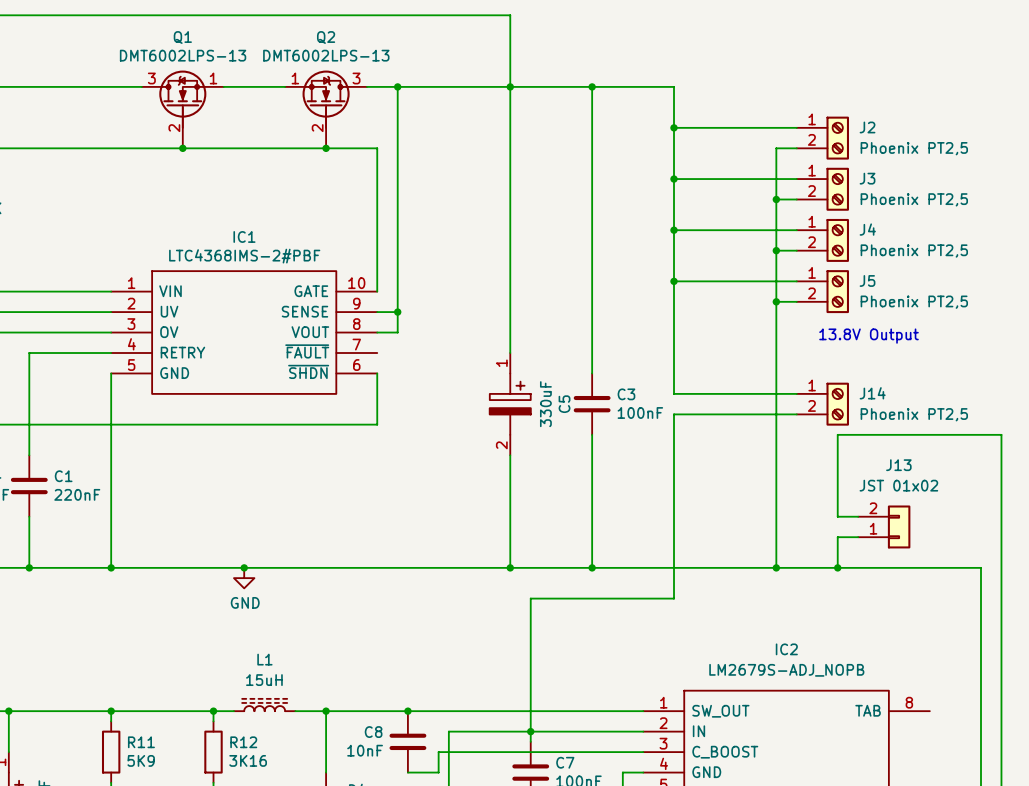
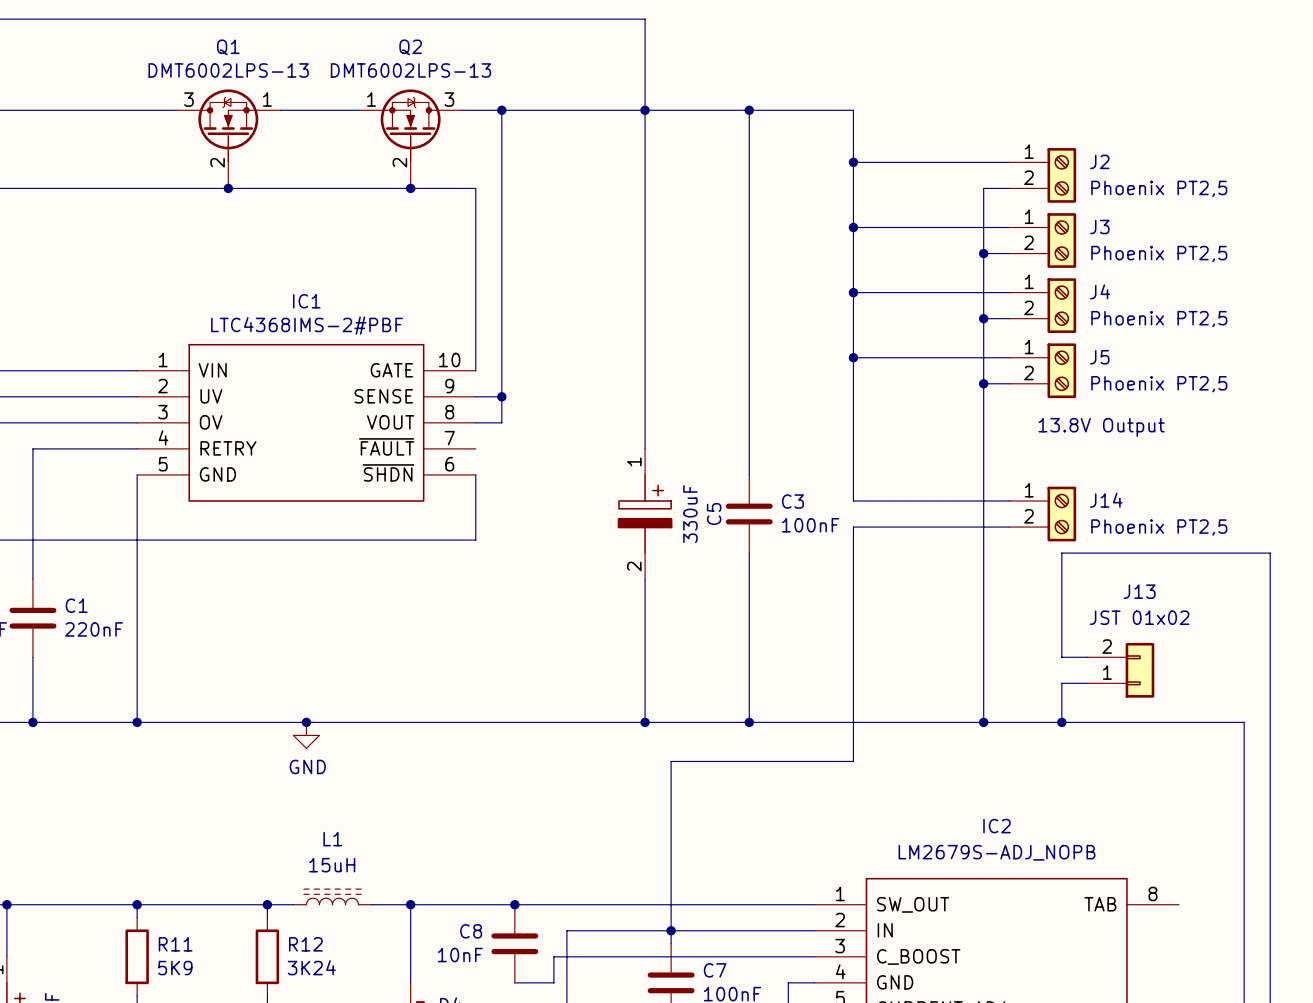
R12 value: 3K16 (248, 760) -> 3K24 (311, 967)

